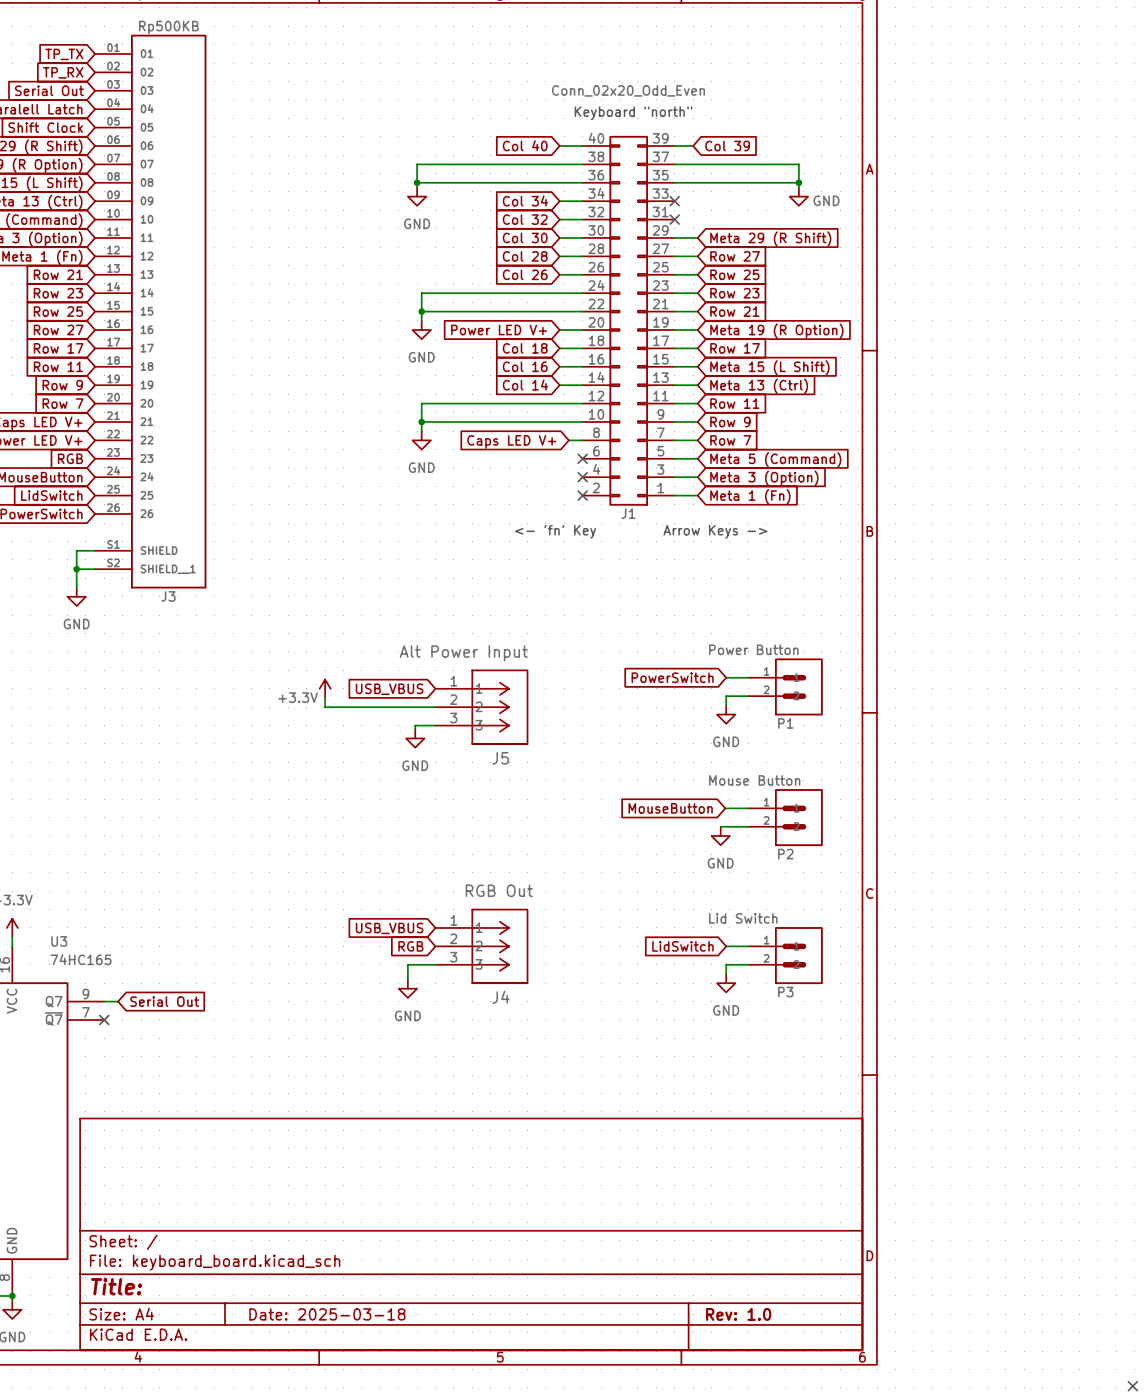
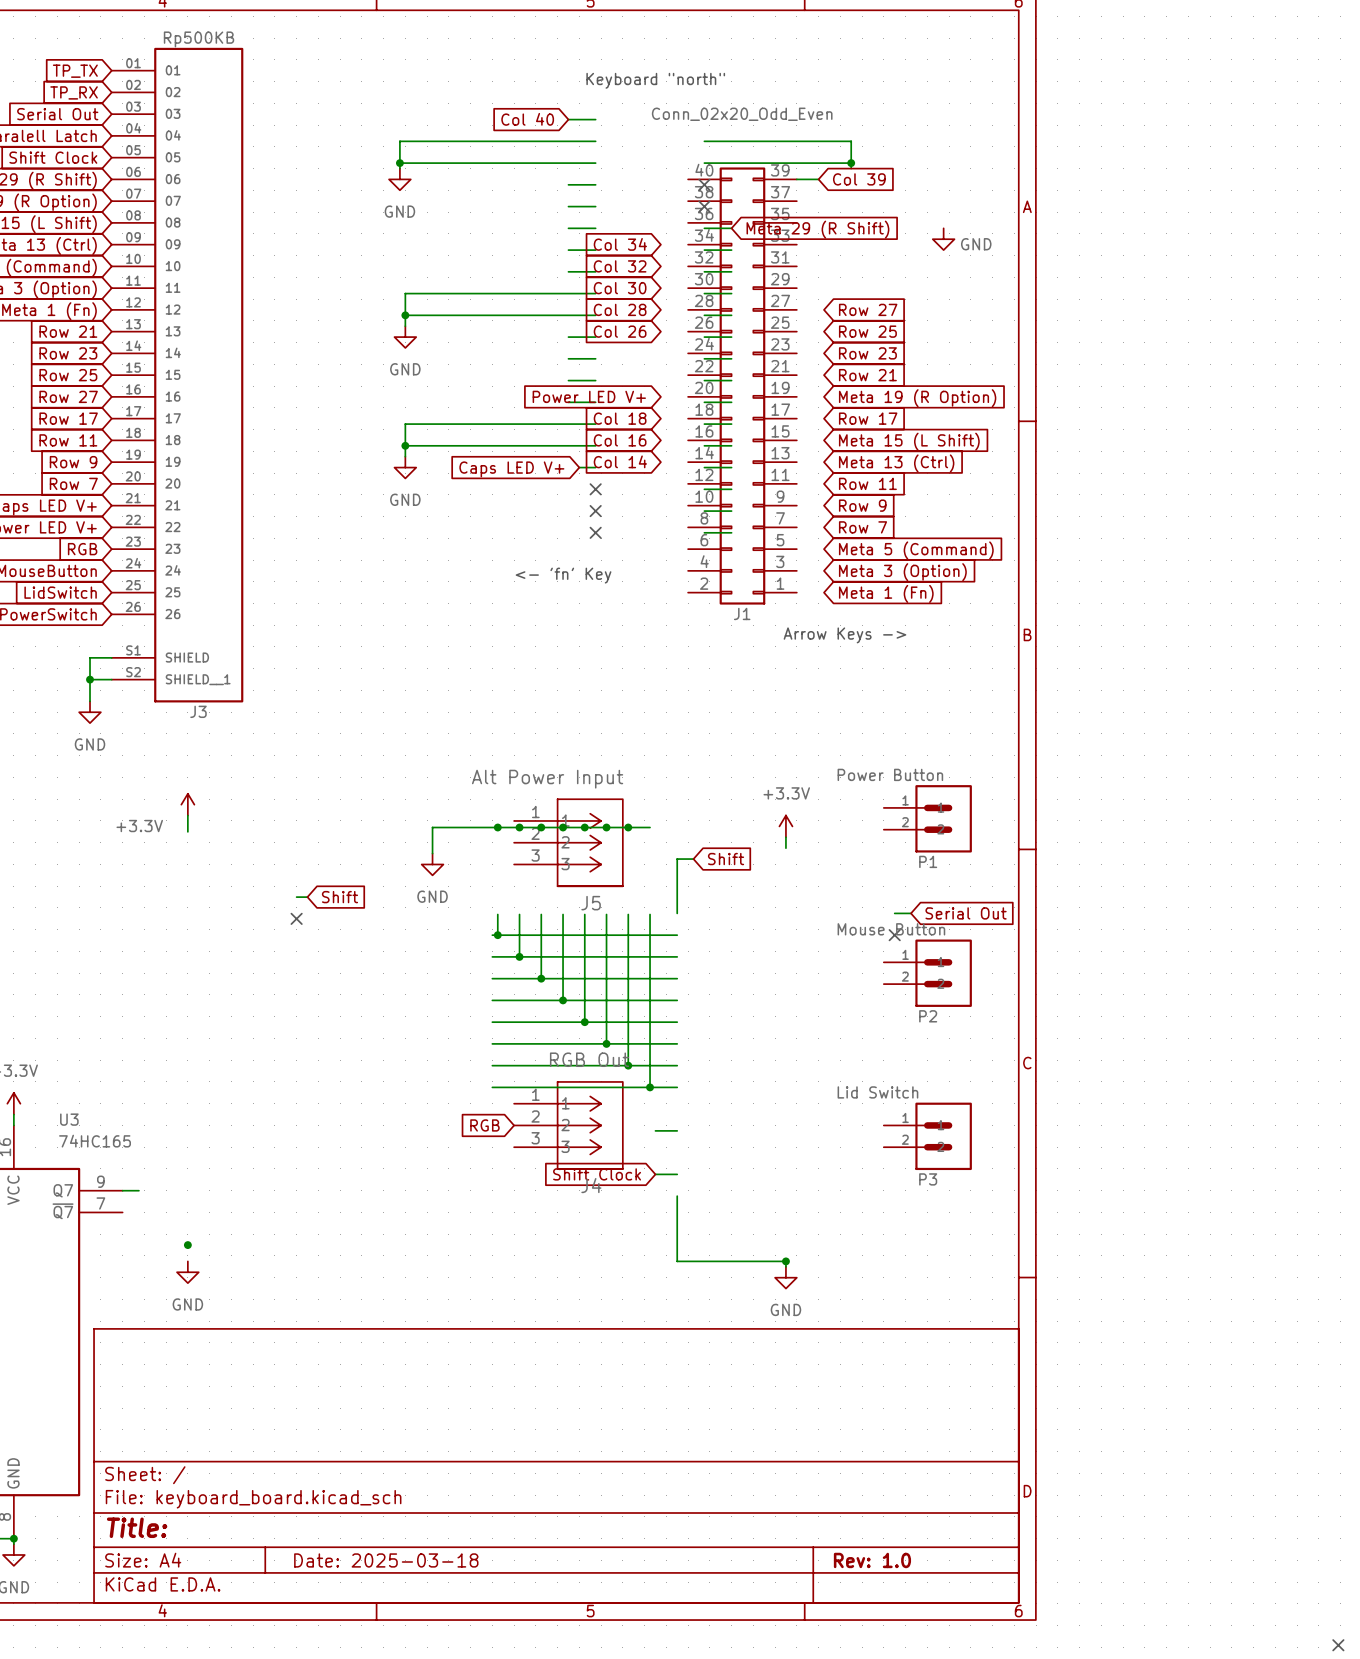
text position: Keyboard "north" (633, 113) -> Keyboard "north" (655, 80)
junction: none -> (399, 163)
junction: none -> (851, 163)
power symbol: none -> GND (399, 179)
global label position: Col 40 (525, 145) -> Col 40 (527, 119)
wire: (559, 145) (582, 145) -> (568, 119) (595, 119)
no-connect mark: none -> (704, 184)
wire: (582, 164) (417, 164) (417, 187) -> (595, 141) (399, 141) (399, 168)
wire: (674, 164) (798, 164) (798, 187) -> (704, 141) (851, 141) (851, 168)
no-connect mark: none -> (704, 206)
wire: (417, 182) (582, 182) -> (399, 163) (595, 163)
junction: (417, 182) -> none
wire: (674, 182) (798, 182) -> (704, 163) (851, 163)
junction: (798, 182) -> none
power symbol: GND (417, 196) -> none
wire: (559, 201) (582, 201) -> (568, 184) (595, 184)
no-connect mark: (674, 201) -> none
wire: (559, 219) (582, 219) -> (568, 206) (595, 206)
no-connect mark: (674, 219) -> none
wire: (559, 237) (582, 237) -> (568, 228) (595, 228)
wire: (674, 237) (697, 237) -> (704, 228) (731, 228)
global label position: Meta 29 (R Shift) (770, 239) -> Meta 29 (R Shift) (817, 229)
wire: (559, 256) (582, 256) -> (568, 250) (595, 250)
wire: (674, 256) (697, 256) -> (704, 250) (731, 250)
junction: none -> (405, 315)
wire: (559, 274) (582, 274) -> (568, 271) (595, 271)
wire: (674, 274) (697, 274) -> (704, 271) (731, 271)
power symbol: none -> GND (405, 337)
wire: (582, 293) (421, 293) (421, 320) -> (595, 293) (405, 293) (405, 326)
wire: (674, 293) (697, 293) -> (704, 293) (731, 293)
wire: (421, 311) (582, 311) -> (405, 315) (595, 315)
junction: (421, 311) -> none
wire: (674, 311) (697, 311) -> (704, 315) (731, 315)
power symbol: GND (421, 329) -> none
wire: (559, 329) (582, 329) -> (568, 337) (595, 337)
wire: (674, 329) (697, 329) -> (704, 337) (731, 337)
wire: (559, 348) (582, 348) -> (568, 358) (595, 358)
wire: (674, 348) (697, 348) -> (704, 358) (731, 358)
wire: (559, 366) (582, 366) -> (568, 380) (595, 380)
wire: (674, 366) (697, 366) -> (704, 380) (731, 380)
junction: none -> (405, 445)
wire: (559, 385) (582, 385) -> (568, 402) (595, 402)
wire: (674, 385) (697, 385) -> (704, 402) (731, 402)
power symbol: none -> GND (405, 467)
wire: (582, 403) (421, 403) (421, 431) -> (595, 424) (405, 424) (405, 456)
wire: (674, 403) (697, 403) -> (704, 424) (731, 424)
no-connect mark: none -> (595, 489)
wire: (421, 421) (582, 421) -> (405, 445) (595, 445)
junction: (421, 421) -> none
wire: (674, 421) (697, 421) -> (704, 445) (731, 445)
no-connect mark: none -> (595, 511)
power symbol: GND (421, 440) -> none
wire: (568, 440) (582, 440) -> (579, 467) (595, 467)
wire: (674, 440) (697, 440) -> (704, 467) (731, 467)
global label position: Caps LED V+ (511, 441) -> Caps LED V+ (511, 469)
no-connect mark: none -> (595, 532)
no-connect mark: (582, 458) -> none
wire: (674, 458) (697, 458) -> (704, 489) (731, 489)
no-connect mark: (582, 477) -> none
wire: (674, 477) (697, 477) -> (704, 511) (731, 511)
no-connect mark: (582, 495) -> none
wire: (674, 495) (697, 495) -> (704, 532) (731, 532)
text position: <- 'fn' Key (555, 531) -> <- 'fn' Key (563, 575)
global label: PowerSwitch (672, 677) -> none
wire: (726, 677) (748, 677) -> none
wire: none -> (187, 815) (187, 831)
power symbol position: +3.3V (325, 688) -> +3.3V (187, 804)
global label: USB_VBUS (389, 689) -> none
power symbol: none -> +3.3V (785, 826)
junction: none -> (497, 827)
junction: none -> (519, 827)
junction: none -> (541, 827)
junction: none -> (563, 827)
junction: none -> (584, 827)
junction: none -> (606, 827)
junction: none -> (628, 827)
wire: none -> (650, 827) (432, 827) (432, 853)
wire: (748, 696) (726, 696) (726, 705) -> none
power symbol text position: +3.3V (298, 697) -> +3.3V (139, 826)
wire: (325, 697) (325, 707) (435, 707) -> none
wire: none -> (785, 837) (785, 848)
power symbol: GND (726, 714) -> none
wire: none -> (693, 859) (677, 859) (677, 913)
global label: none -> Shift (726, 859)
wire: (435, 725) (415, 725) (415, 729) -> none
power symbol position: GND (415, 738) -> GND (432, 864)
wire: none -> (296, 897) (307, 897)
global label: none -> Shift (340, 897)
wire: none -> (894, 913) (911, 913)
global label: none -> Serial Out (966, 913)
wire: none -> (497, 914) (497, 935)
wire: none -> (519, 914) (519, 956)
wire: none -> (541, 914) (541, 978)
wire: none -> (563, 914) (563, 1000)
wire: none -> (584, 914) (584, 1022)
wire: none -> (606, 914) (606, 1043)
wire: none -> (628, 914) (628, 1065)
wire: none -> (650, 914) (650, 1087)
no-connect mark: none -> (296, 918)
wire: none -> (492, 935) (677, 935)
junction: none -> (497, 935)
no-connect mark: none -> (894, 935)
wire: none -> (492, 956) (677, 956)
junction: none -> (519, 956)
global label: MouseButton (670, 808) -> none
wire: (725, 808) (748, 808) -> none
wire: none -> (492, 978) (677, 978)
junction: none -> (541, 978)
wire: (720, 826) (748, 826) -> none
power symbol: GND (720, 835) -> none
wire: none -> (492, 1000) (677, 1000)
junction: none -> (563, 1000)
wire: none -> (492, 1022) (677, 1022)
junction: none -> (584, 1022)
wire: none -> (492, 1043) (677, 1043)
junction: none -> (606, 1043)
wire: none -> (492, 1065) (677, 1065)
junction: none -> (628, 1065)
wire: none -> (492, 1087) (677, 1087)
junction: none -> (650, 1087)
global label: USB_VBUS (389, 928) -> none
global label: LidSwitch (682, 946) -> none
wire: (726, 946) (748, 946) -> none
wire: none -> (655, 1130) (677, 1130)
wire: (435, 964) (407, 964) (407, 979) -> none
wire: (748, 964) (726, 964) (726, 973) -> none
power symbol position: GND (726, 983) -> GND (785, 1277)
global label: none -> Shift Clock (597, 1174)
wire: none -> (655, 1174) (677, 1174)
power symbol: GND (407, 988) -> none
global label: Serial Out (164, 1001) -> none
wire: none -> (677, 1196) (677, 1261) (785, 1261) (785, 1266)
no-connect mark: (104, 1019) -> none
junction: none -> (187, 1245)
junction: none -> (785, 1261)
power symbol: none -> GND (187, 1272)

